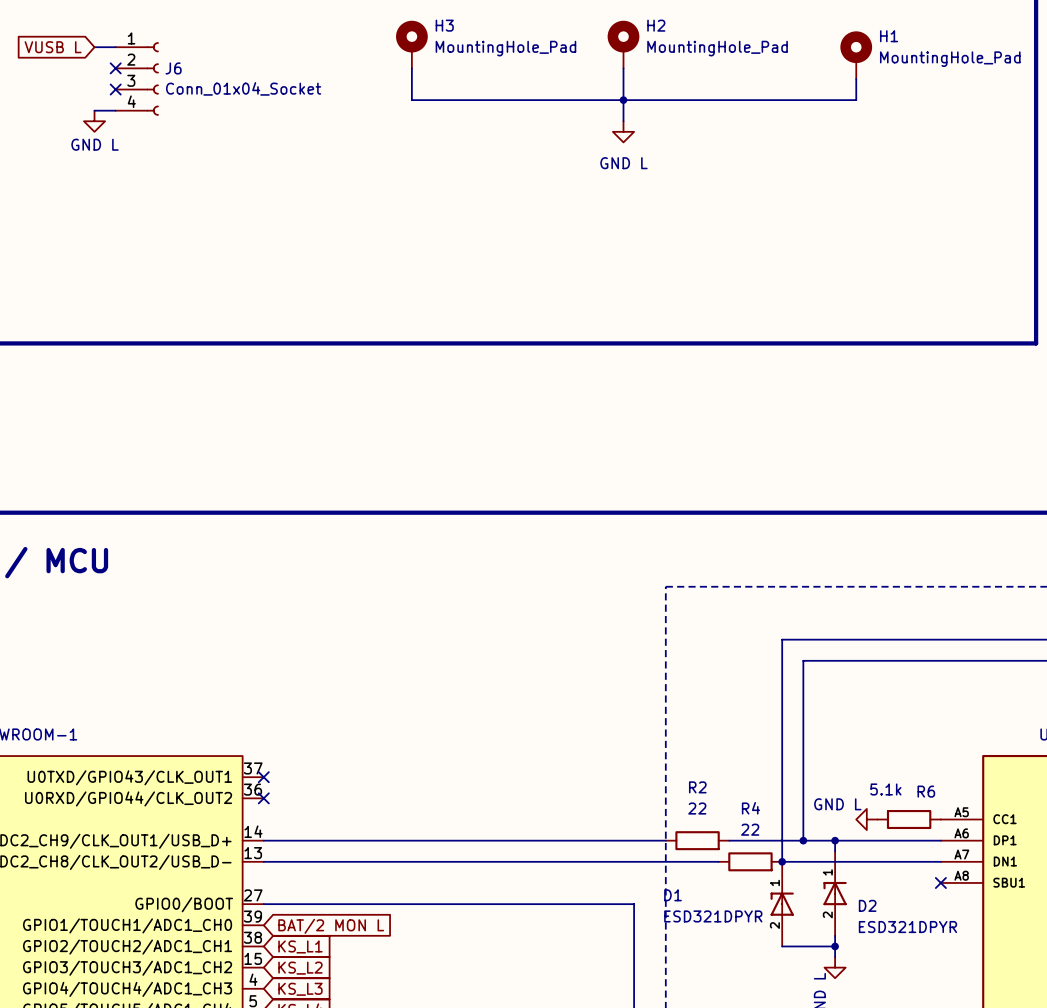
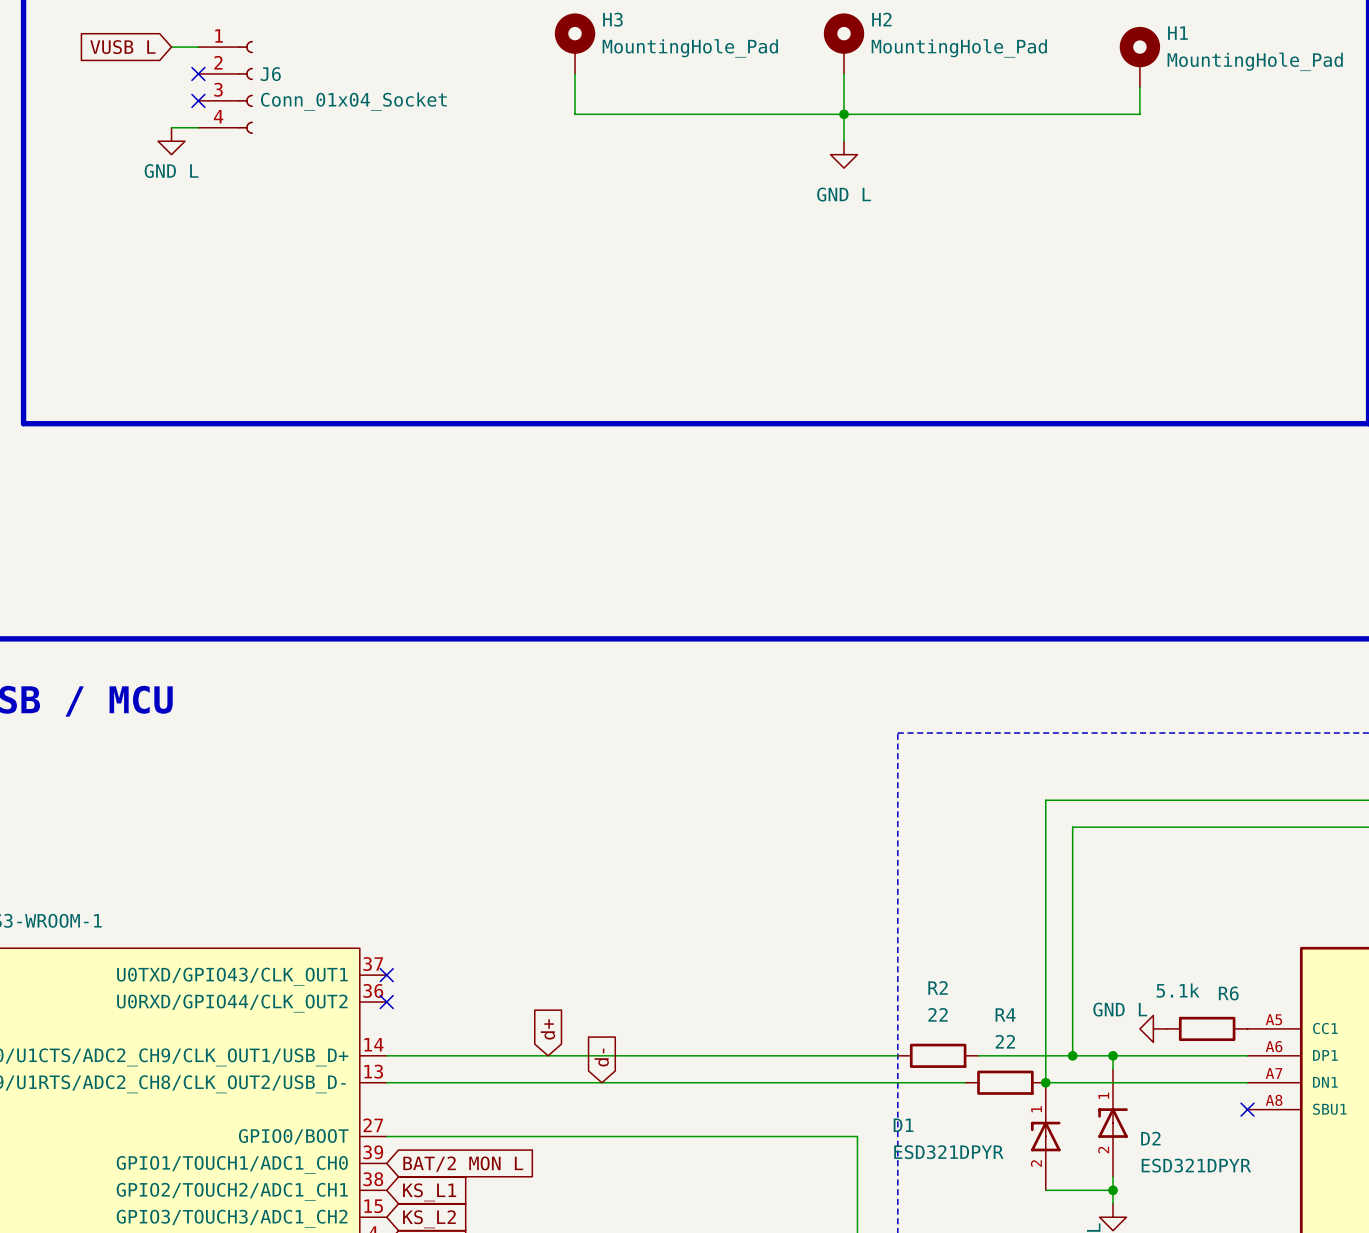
global label: none -> d+ (547, 1029)
global label: none -> d- (601, 1057)

